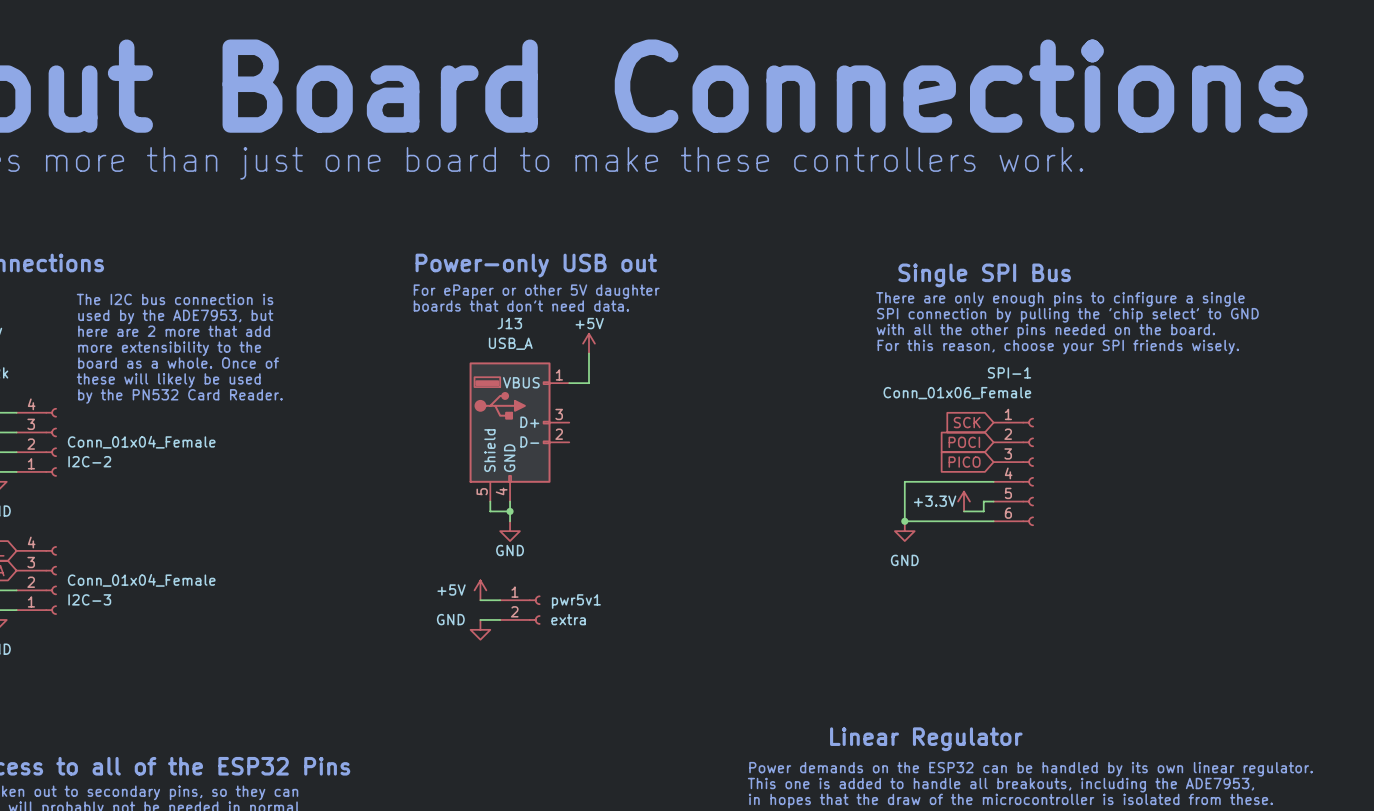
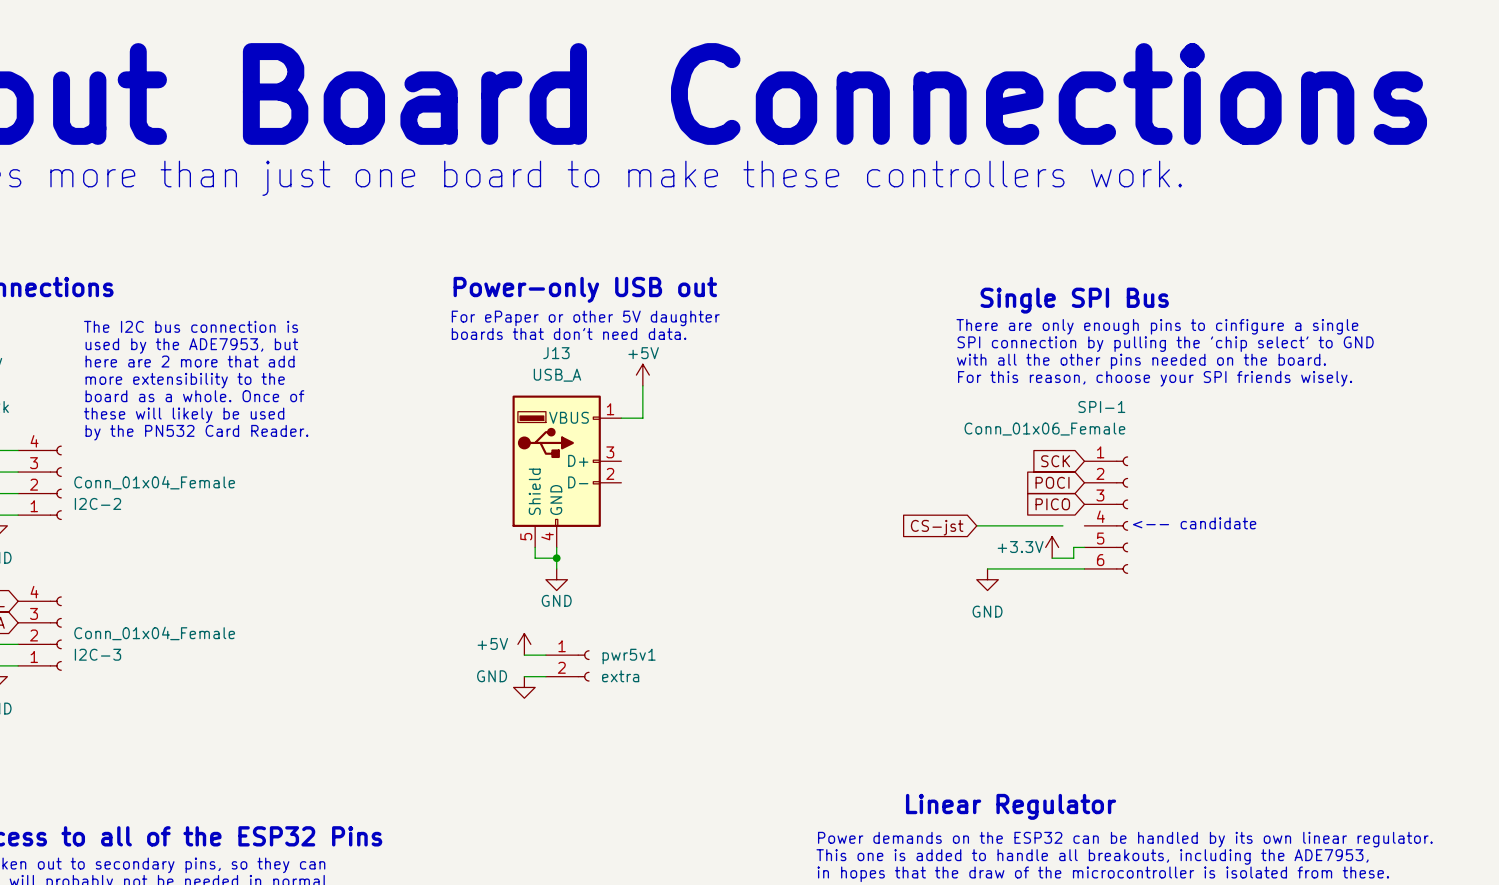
text: none -> <-- candidate (1194, 523)
wire: (904, 481) (904, 521) -> (987, 525) (976, 525)
wire: (973, 481) (993, 481) -> none
global label: none -> CS-jst (937, 527)
junction: (904, 521) -> none

